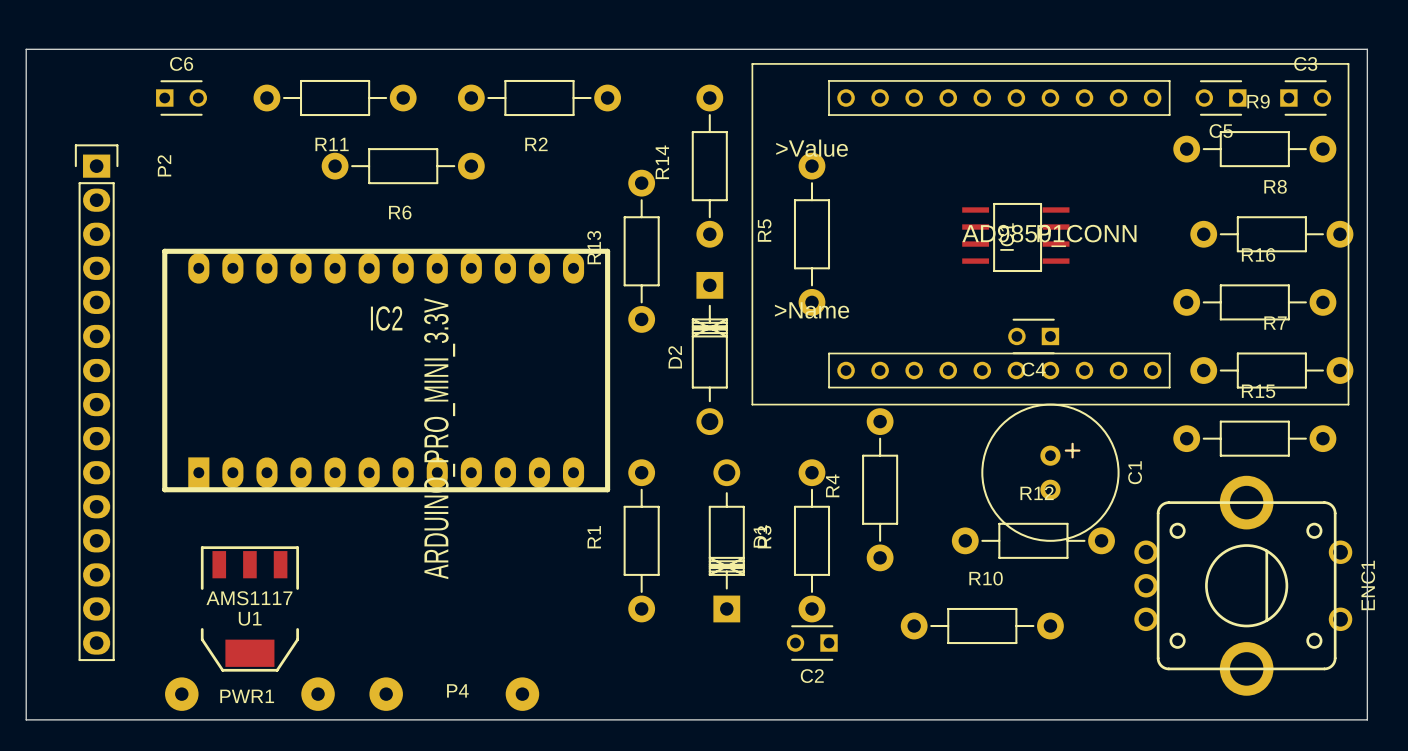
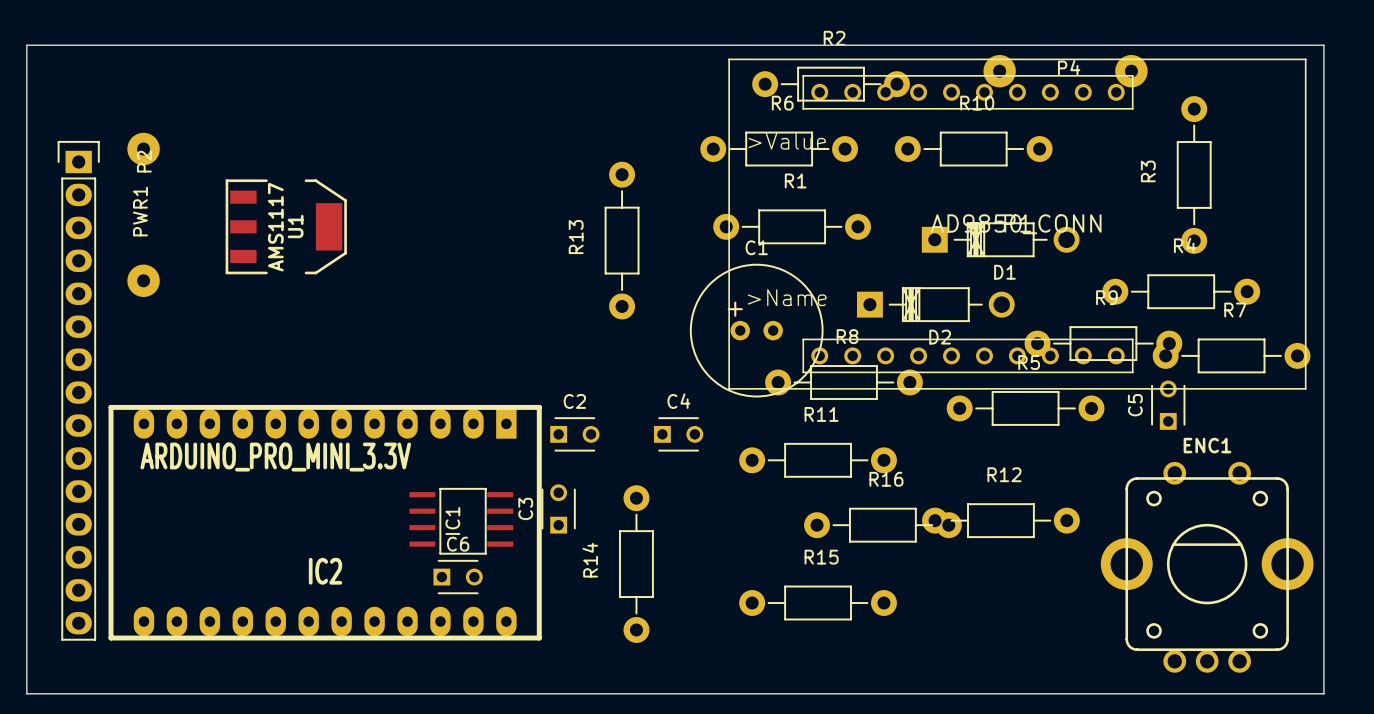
C6 position: (181, 98) -> (458, 577)
R11 position: (335, 98) -> (818, 460)
R2 position: (539, 98) -> (831, 84)
C5 rotation: 0° (1221, 98) -> 90° clockwise (1168, 405)
C5 position: (1221, 98) -> (1168, 405)
C3 rotation: 0° (1305, 98) -> 90° counterclockwise (558, 508)
C3 position: (1305, 98) -> (558, 508)
R11 name position: R11 (332, 144) -> R11 (821, 414)
R2 name position: R2 (536, 144) -> R2 (834, 38)
R9 position: (1254, 149) -> (1103, 343)
R6 position: (403, 166) -> (779, 149)
R14 position: (709, 166) -> (636, 564)
R6 name position: R6 (400, 212) -> R6 (782, 103)
R5 rotation: 0° (811, 234) -> 90° clockwise (1025, 408)
R5 position: (811, 234) -> (1025, 408)
R8 position: (1271, 234) -> (843, 382)
IC1 position: (1015, 237) -> (461, 521)
R16 position: (1254, 302) -> (882, 525)
C4 rotation: 0° (1033, 336) -> 180° (678, 434)
C4 position: (1033, 336) -> (678, 434)
D2 rotation: 0° (709, 353) -> 90° counterclockwise (935, 304)
D2 position: (709, 353) -> (935, 304)
IC2 rotation: 0° (386, 370) -> 180° (325, 522)
P2 position: (96, 402) -> (78, 390)
R15 position: (1254, 438) -> (818, 603)
C1 rotation: 0° (1050, 472) -> 90° counterclockwise (756, 330)
C1 position: (1050, 472) -> (756, 330)
R4 rotation: 0° (880, 489) -> 90° clockwise (1181, 291)
R4 position: (880, 489) -> (1181, 291)
R1 rotation: 0° (641, 540) -> 90° clockwise (792, 226)
R1 position: (641, 540) -> (792, 226)
D1 rotation: 0° (726, 540) -> 90° clockwise (1000, 239)
D1 position: (726, 540) -> (1000, 239)
R3 position: (811, 540) -> (1194, 174)
ENC1 rotation: 0° (1243, 585) -> 90° counterclockwise (1207, 567)
U1 rotation: 0° (249, 608) -> 90° counterclockwise (286, 226)
U1 position: (249, 608) -> (286, 226)
R10 position: (982, 626) -> (973, 149)
C2 rotation: 0° (812, 643) -> 180° (574, 434)
C2 position: (812, 643) -> (574, 434)
PWR1 rotation: 0° (249, 694) -> 90° clockwise (143, 214)
PWR1 position: (249, 694) -> (143, 214)
P4 position: (454, 694) -> (1065, 71)

